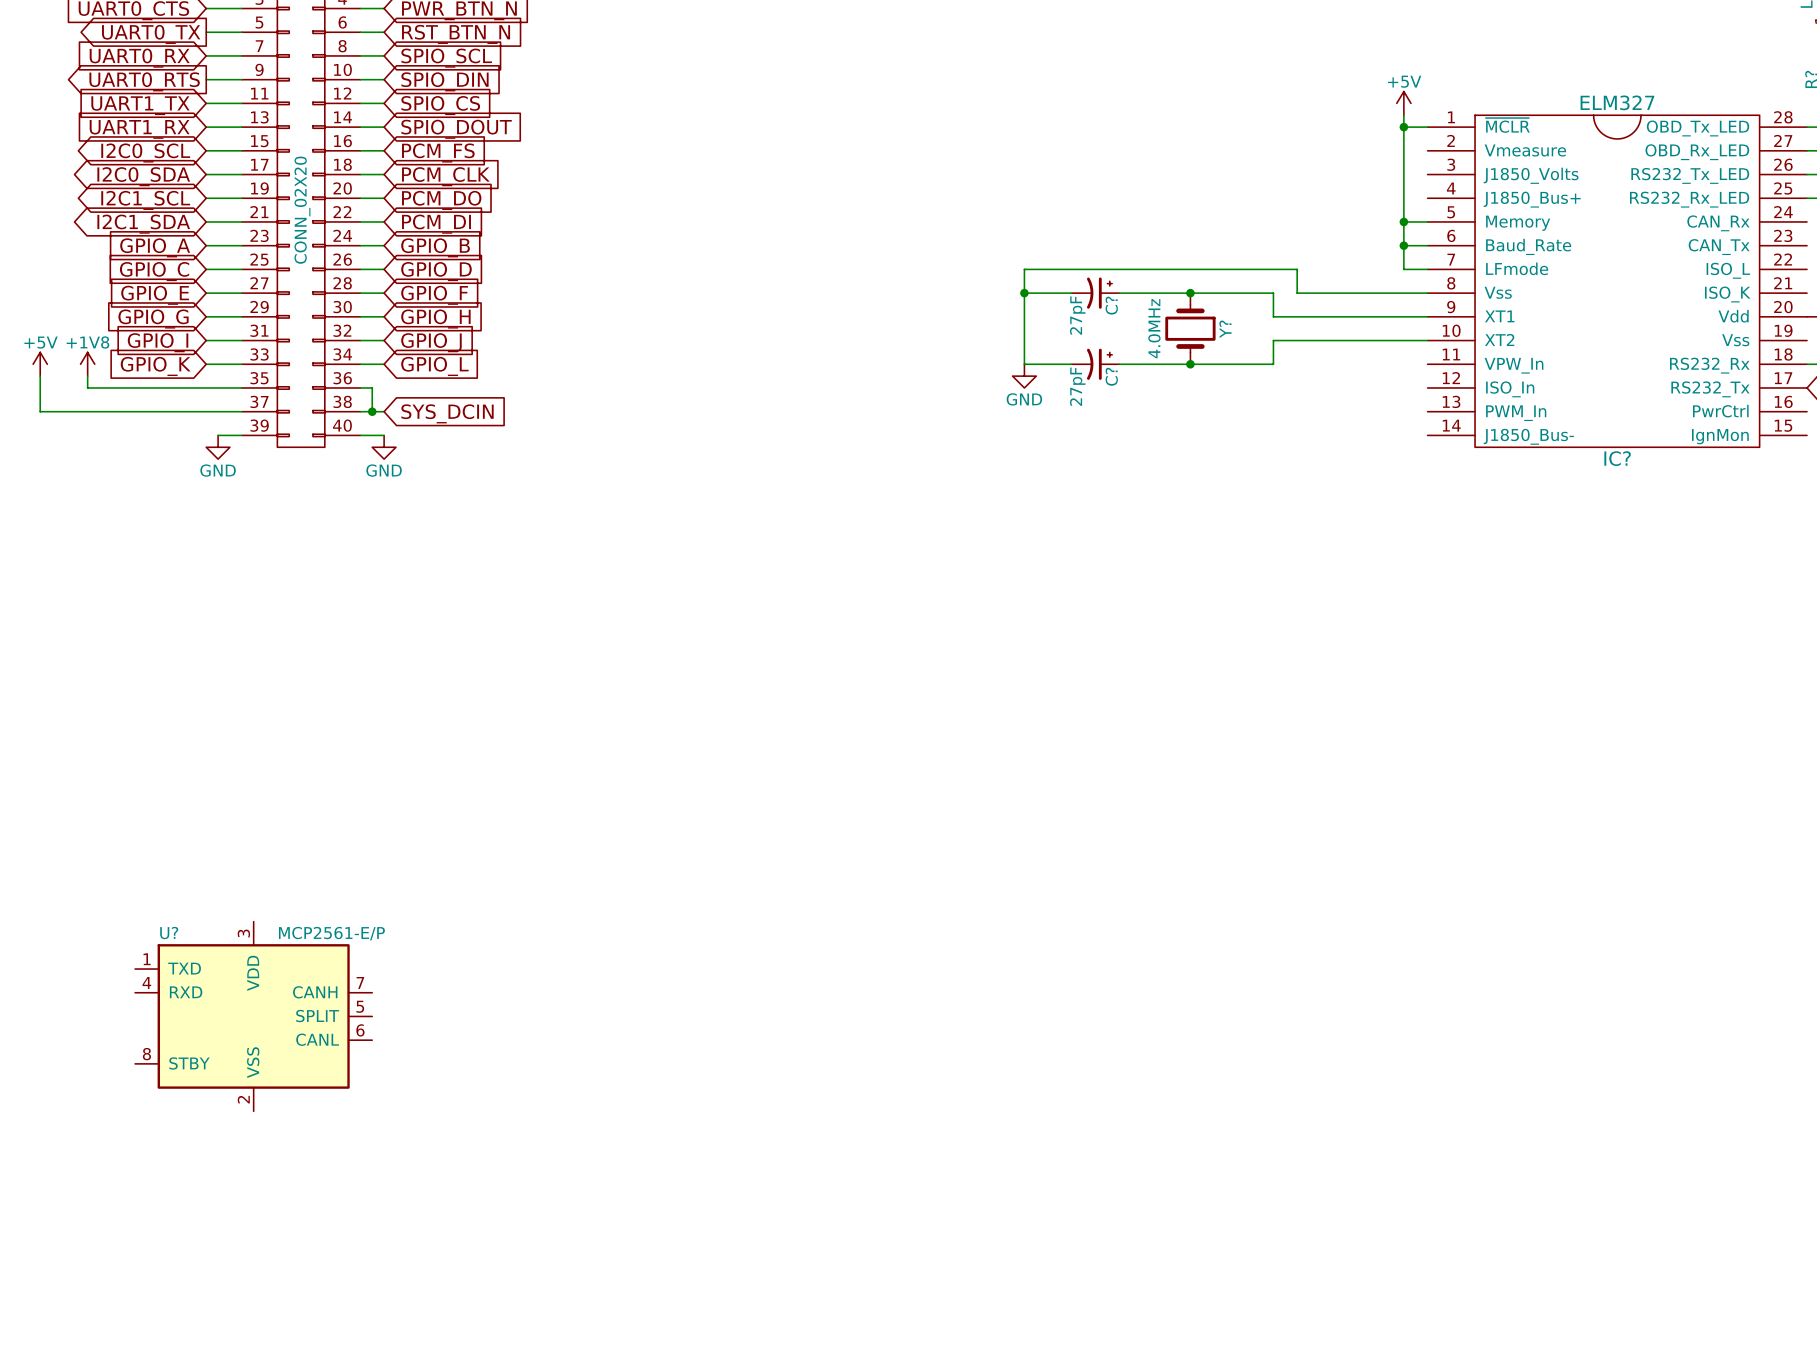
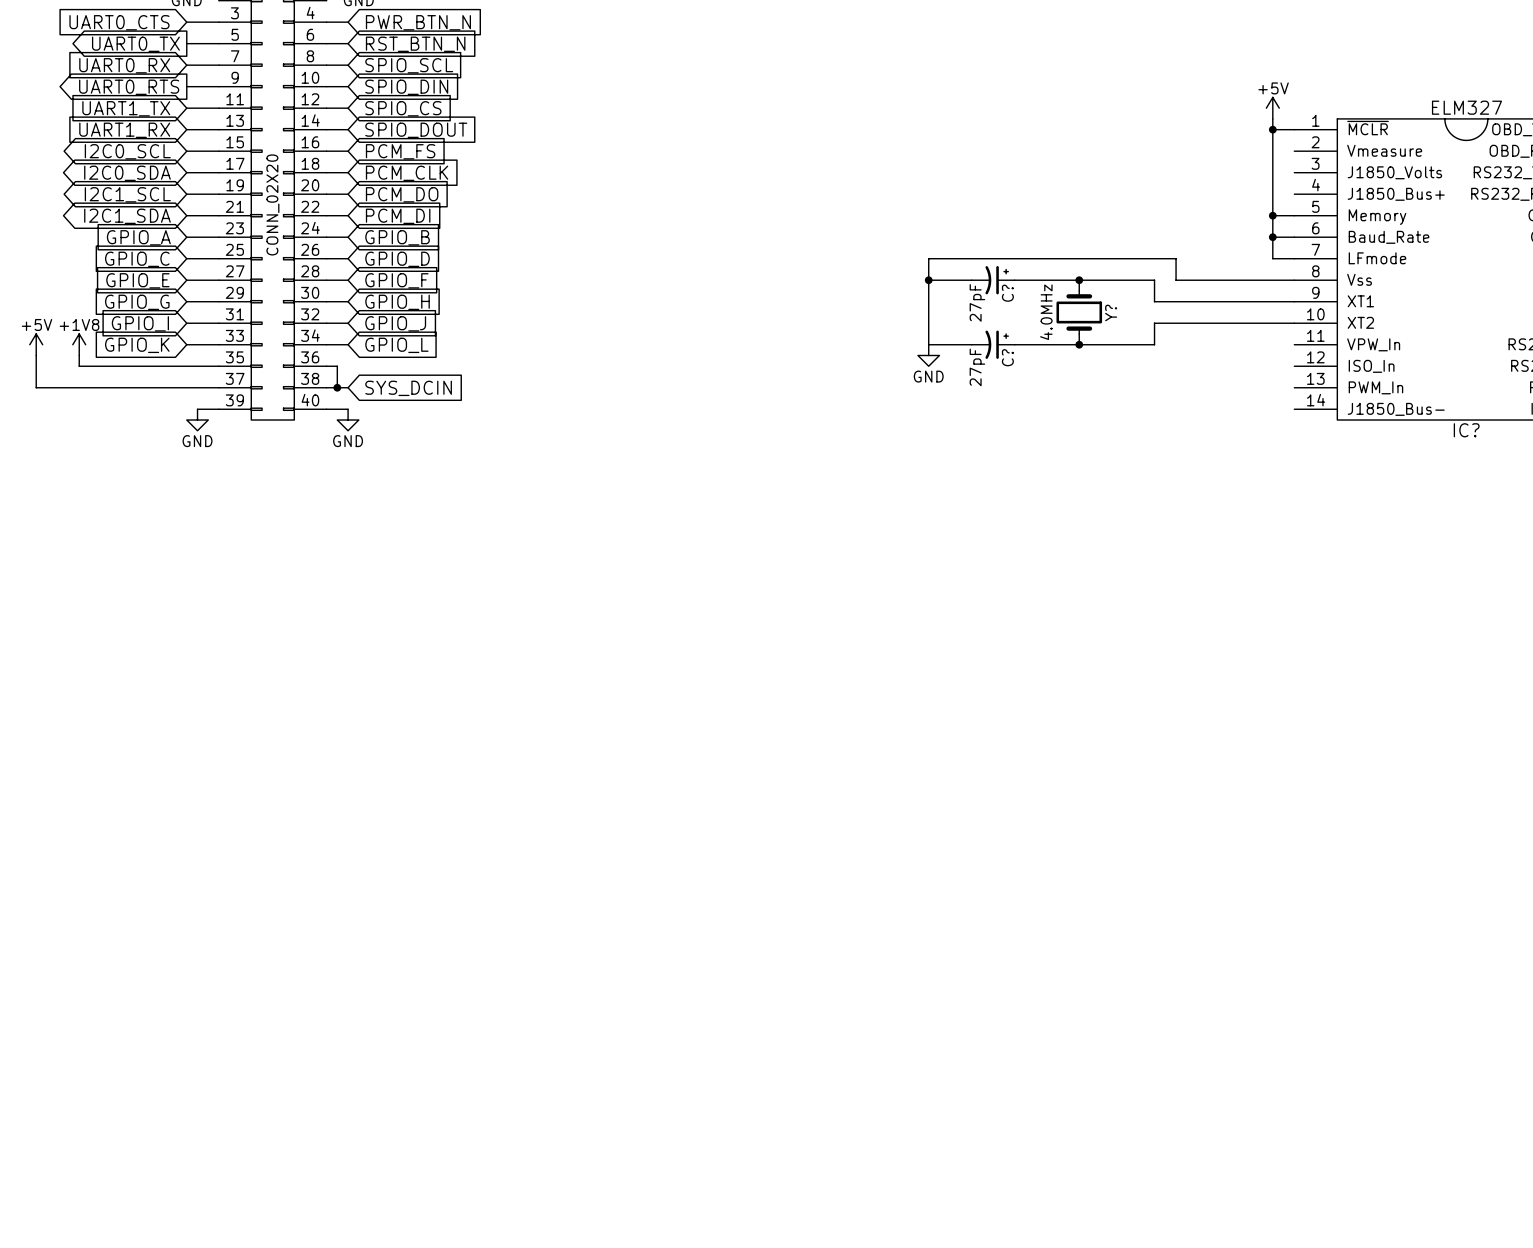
U?: MCP2561-E/P (253, 1016) -> none

